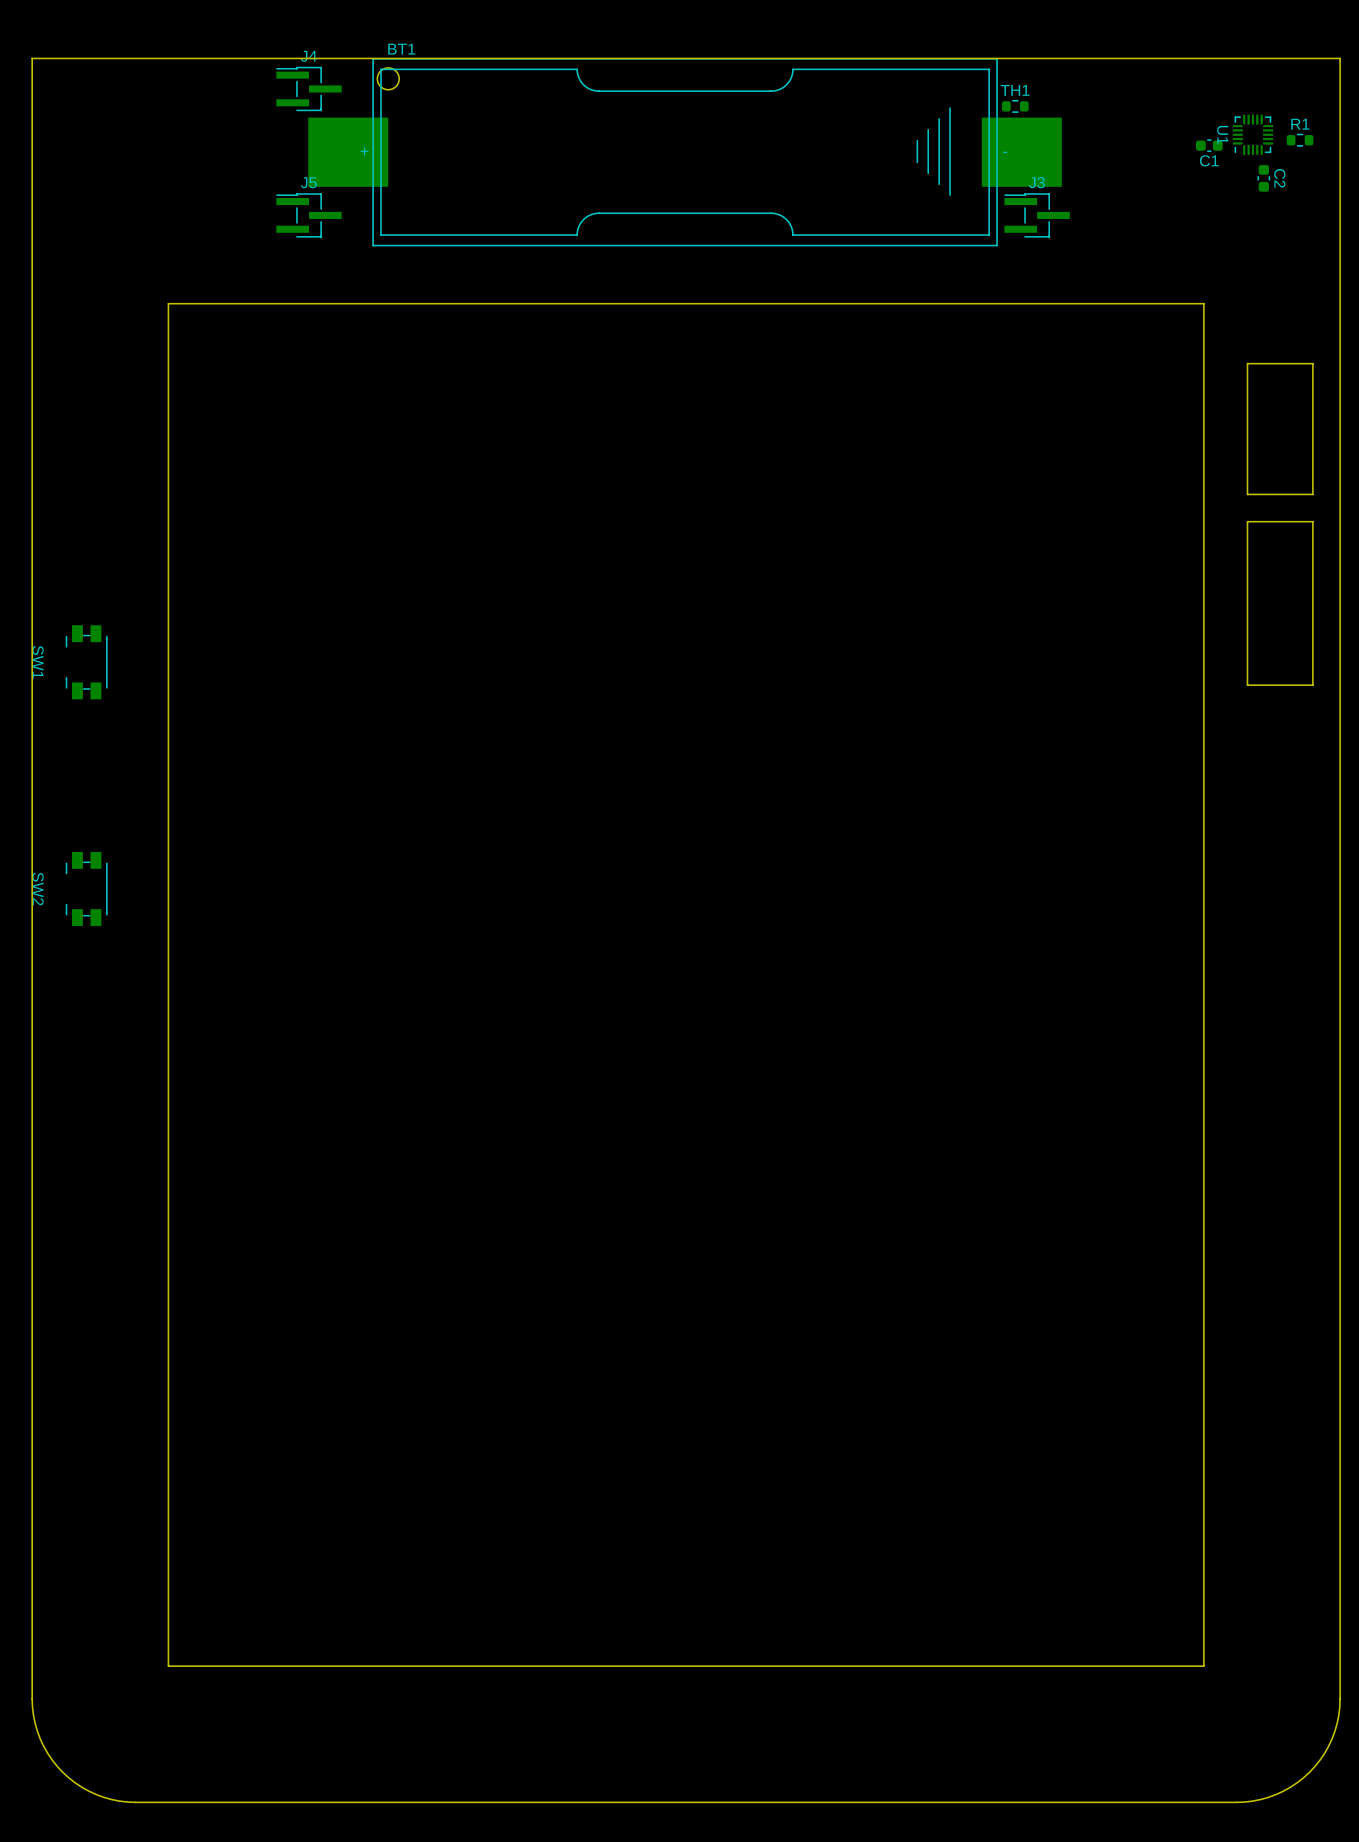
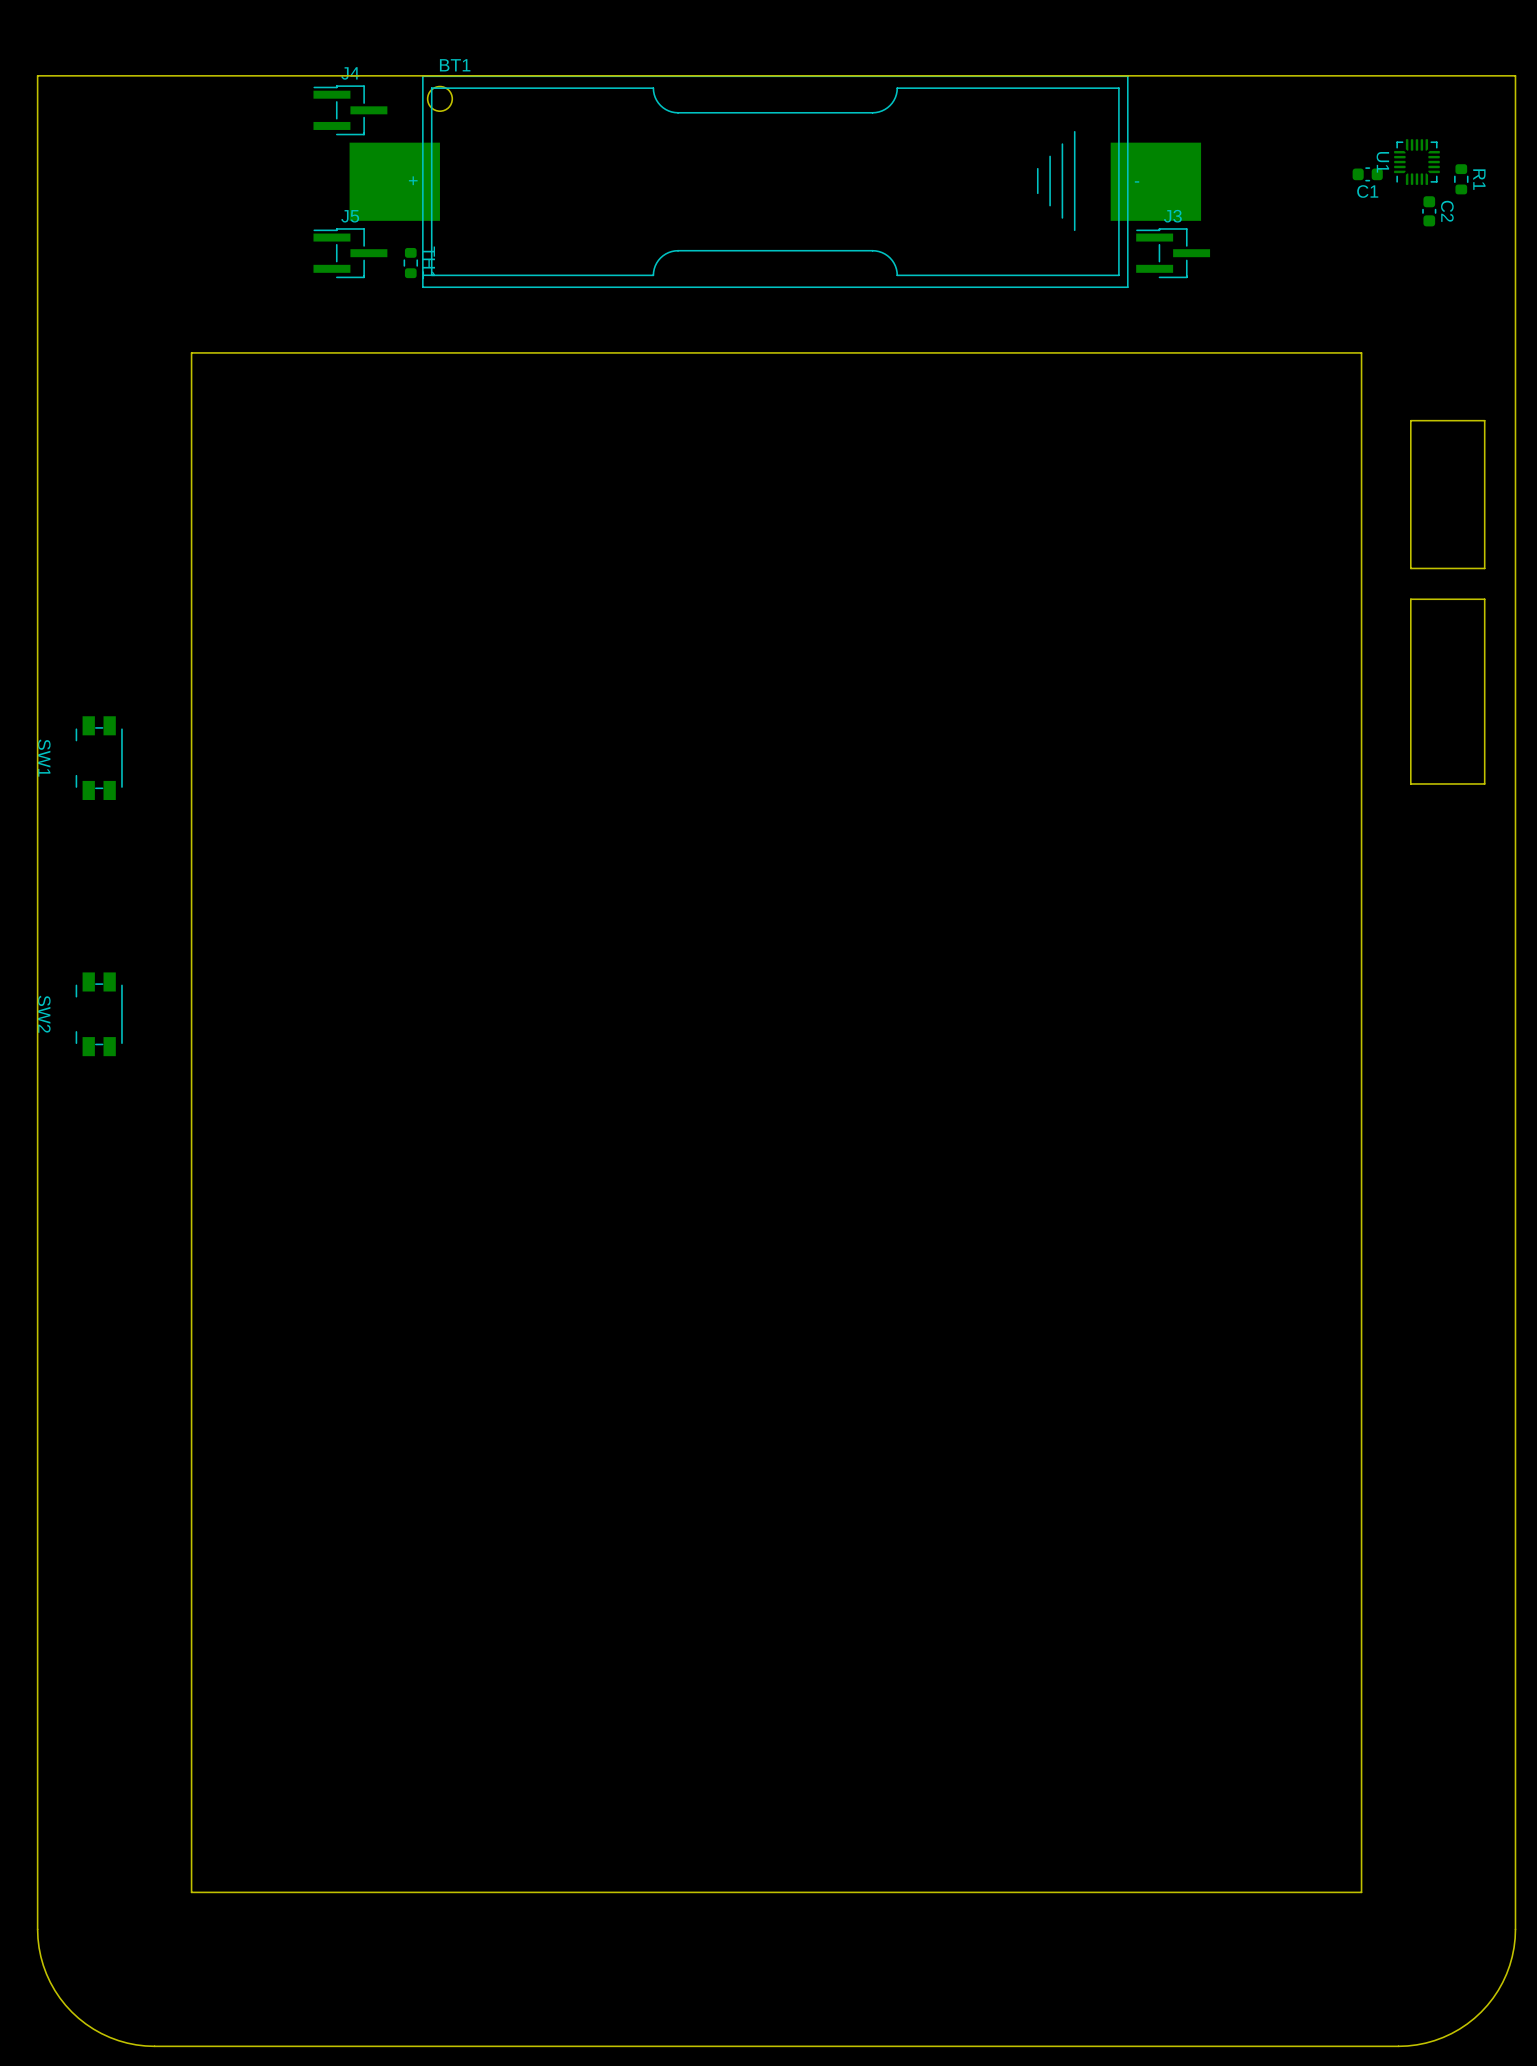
TH1 rotation: 0° (1015, 106) -> 90° clockwise (410, 263)
TH1 position: (1015, 106) -> (410, 263)
R1 rotation: 0° (1300, 140) -> 90° clockwise (1461, 179)

